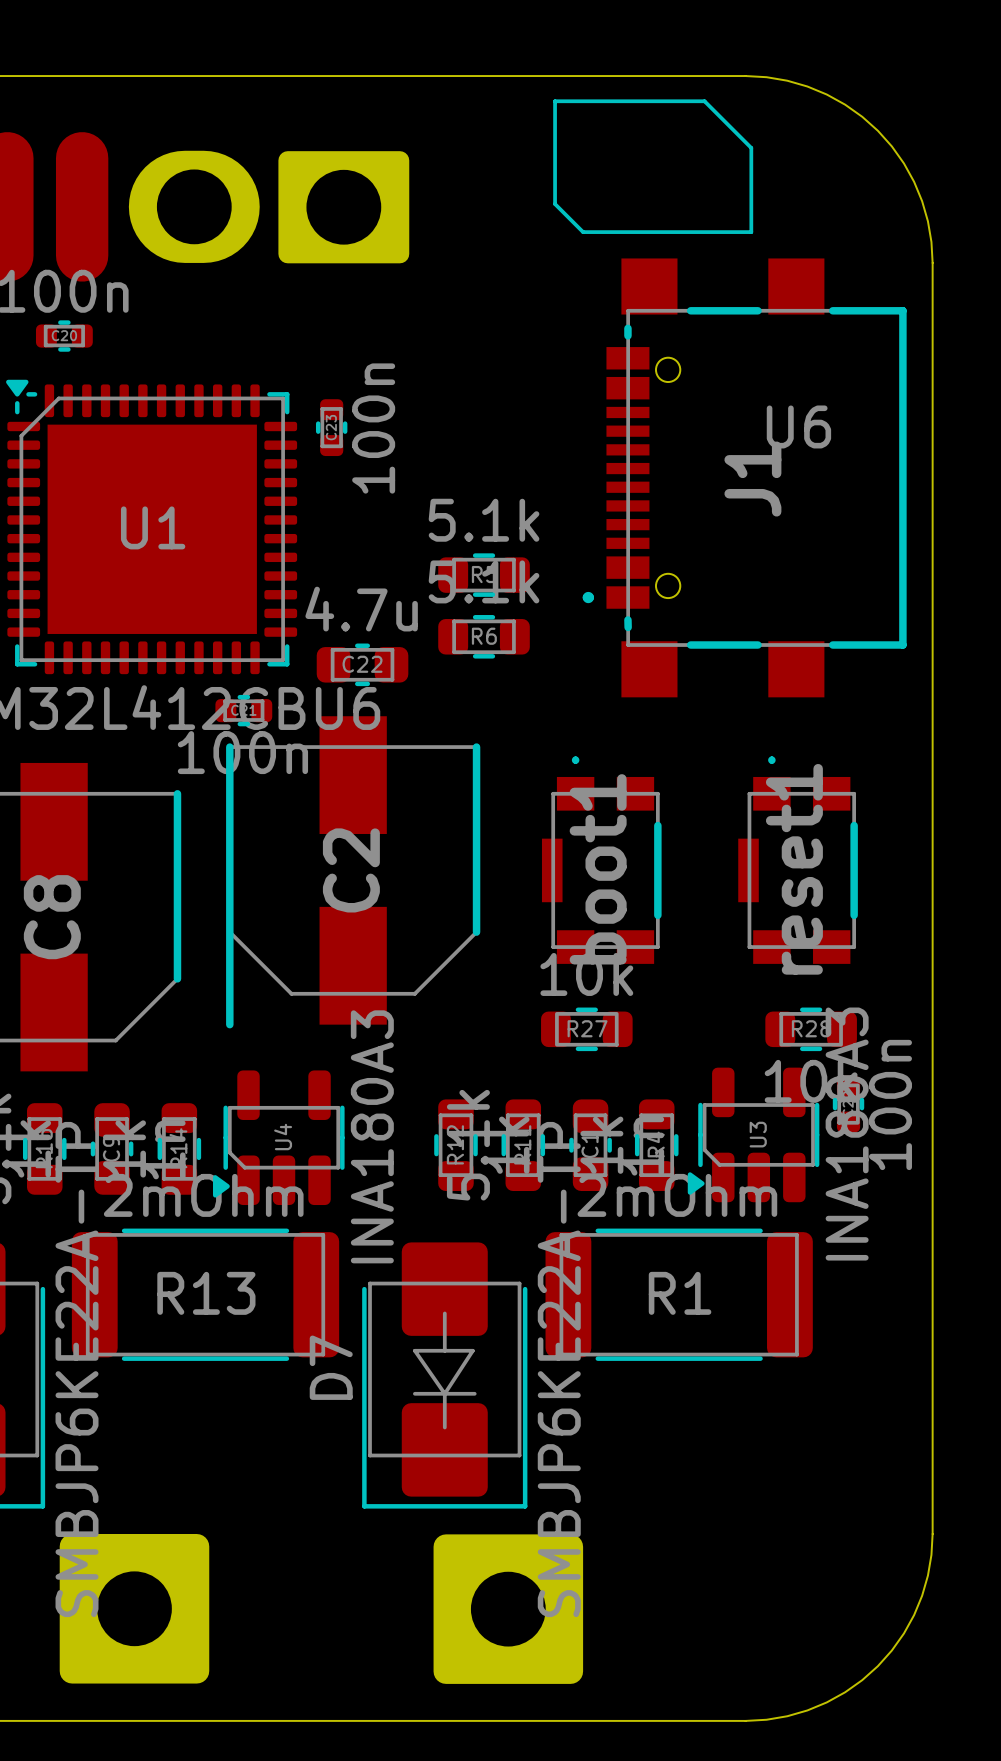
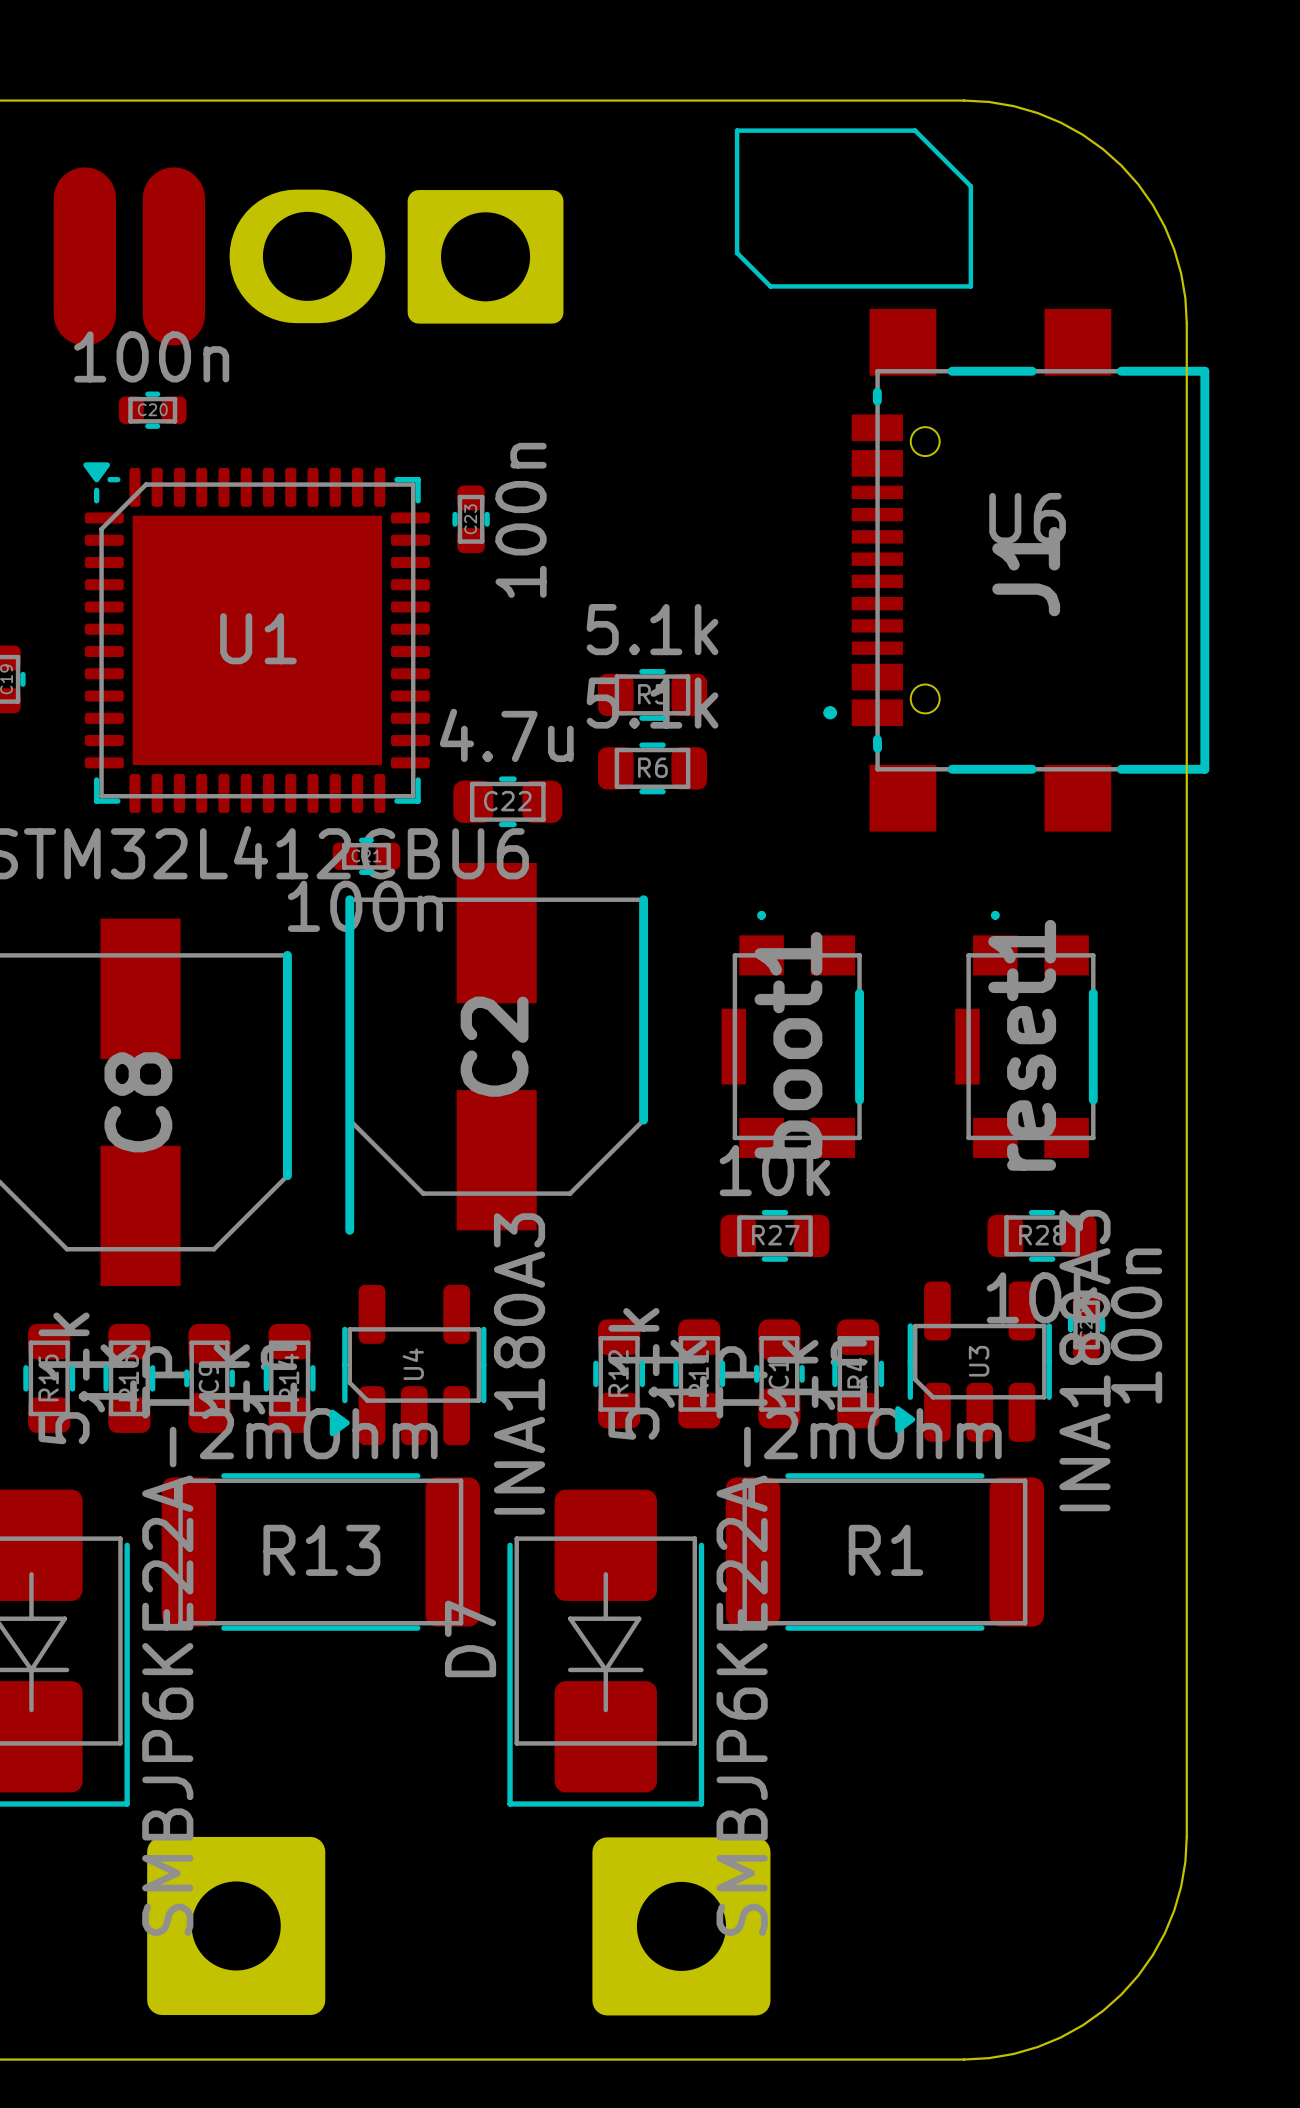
J1 position: (744, 477) -> (1016, 570)

